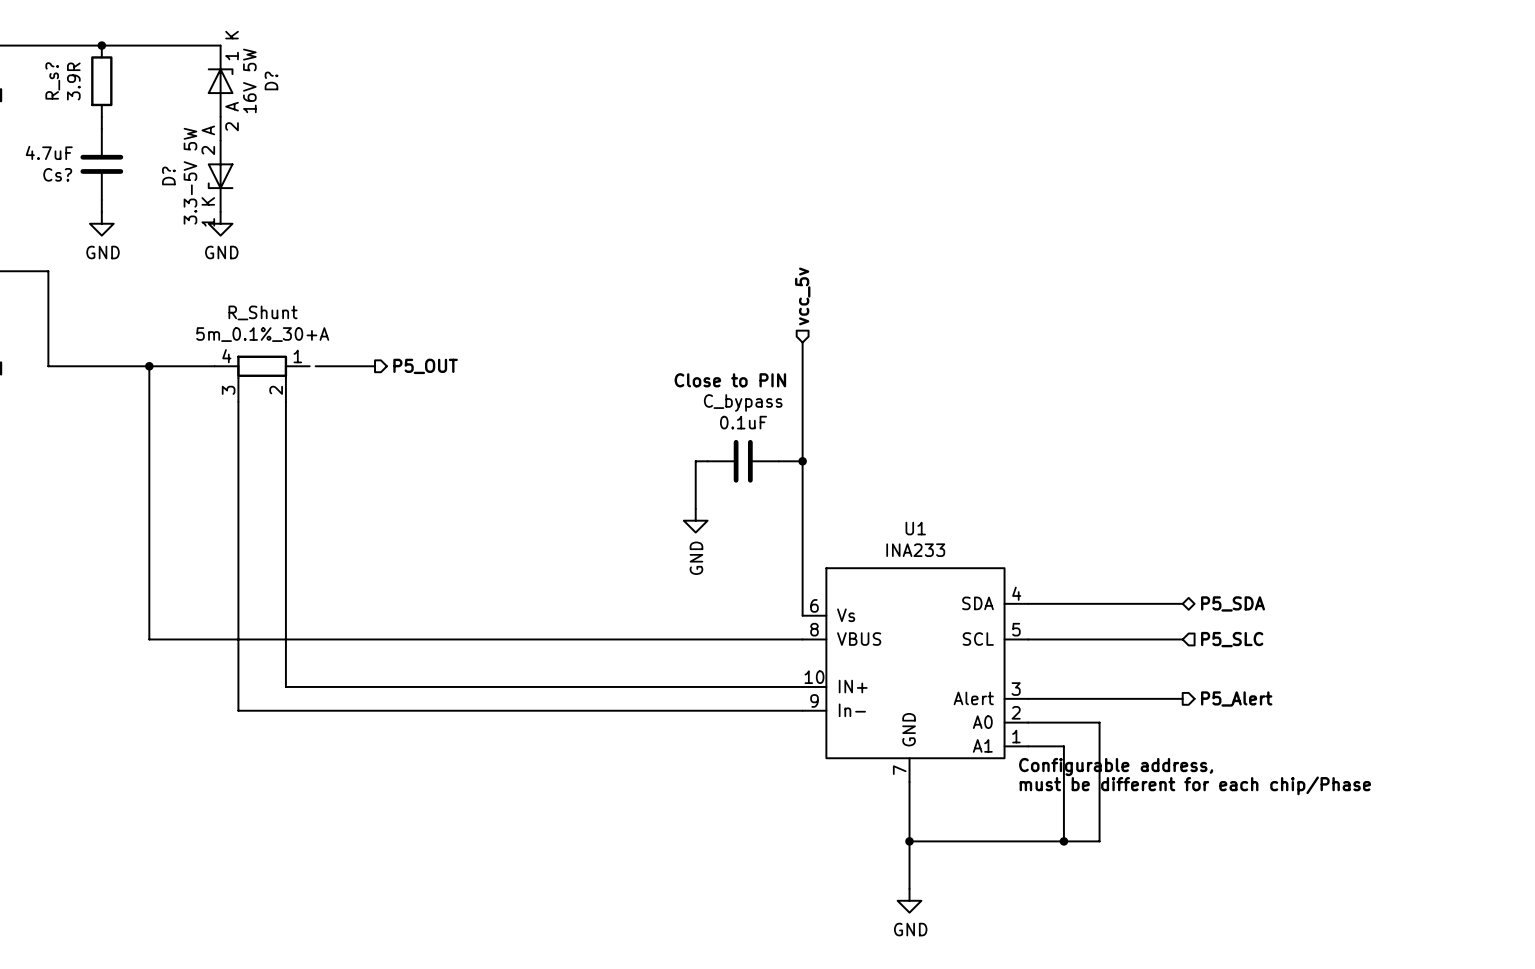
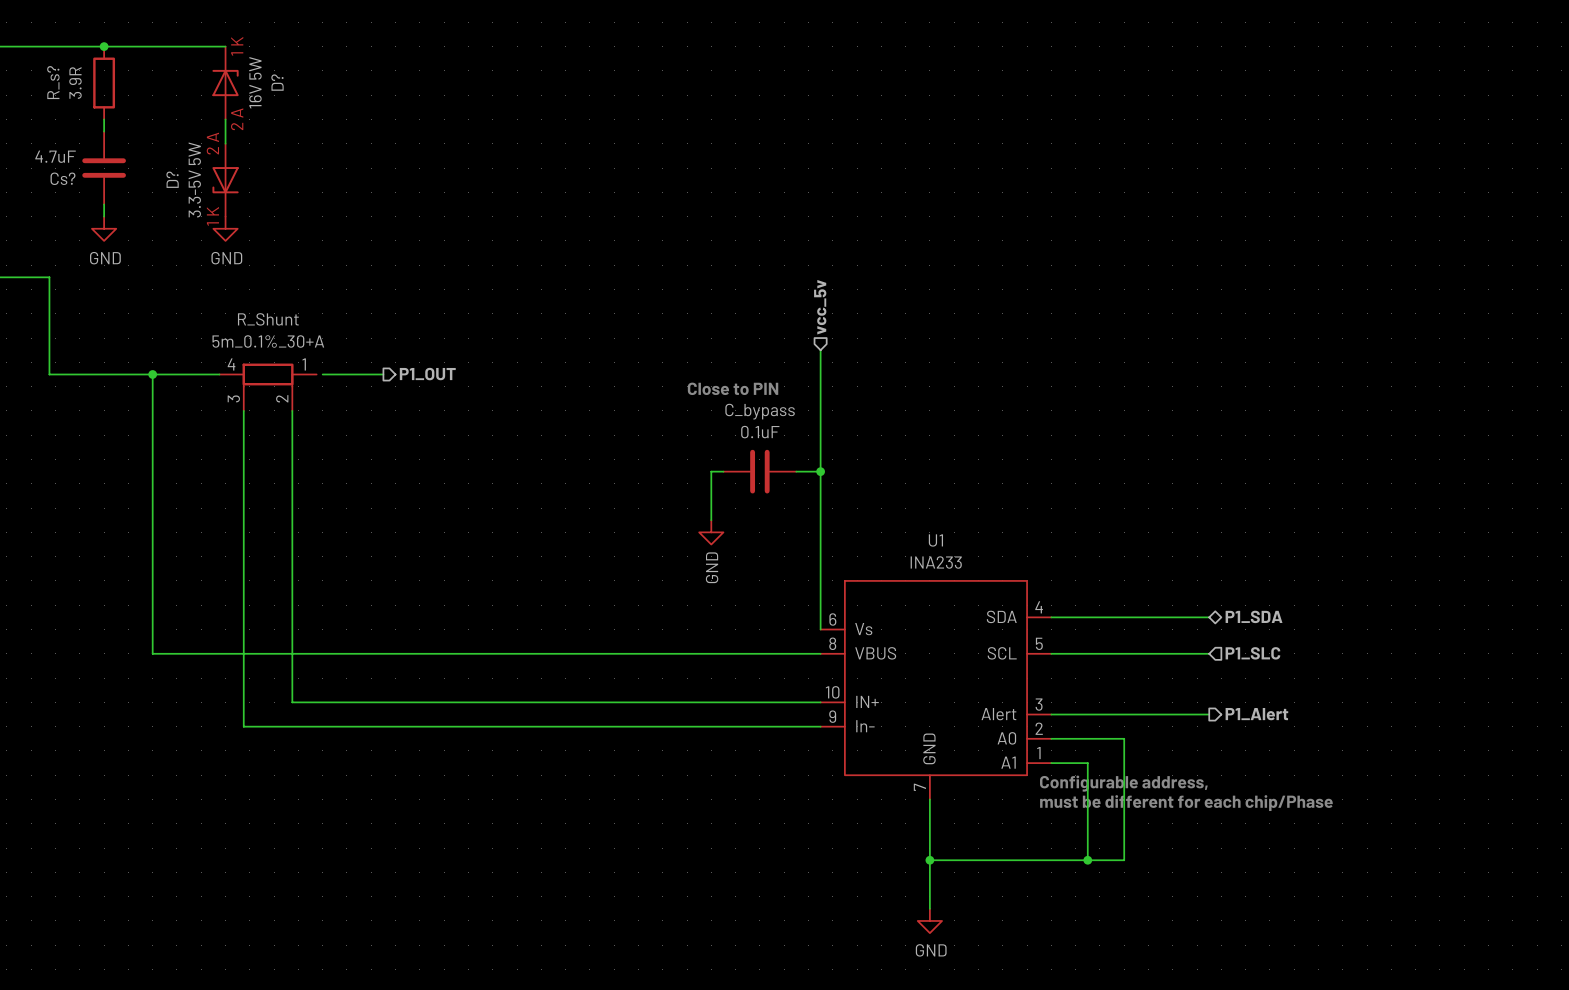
hierarchical label: P5_OUT (425, 366) -> P1_OUT (427, 374)
hierarchical label: P5_SDA (1233, 603) -> P1_SDA (1254, 616)
hierarchical label: P5_SLC (1232, 639) -> P1_SLC (1252, 653)
hierarchical label: P5_Alert (1236, 698) -> P1_Alert (1256, 714)

